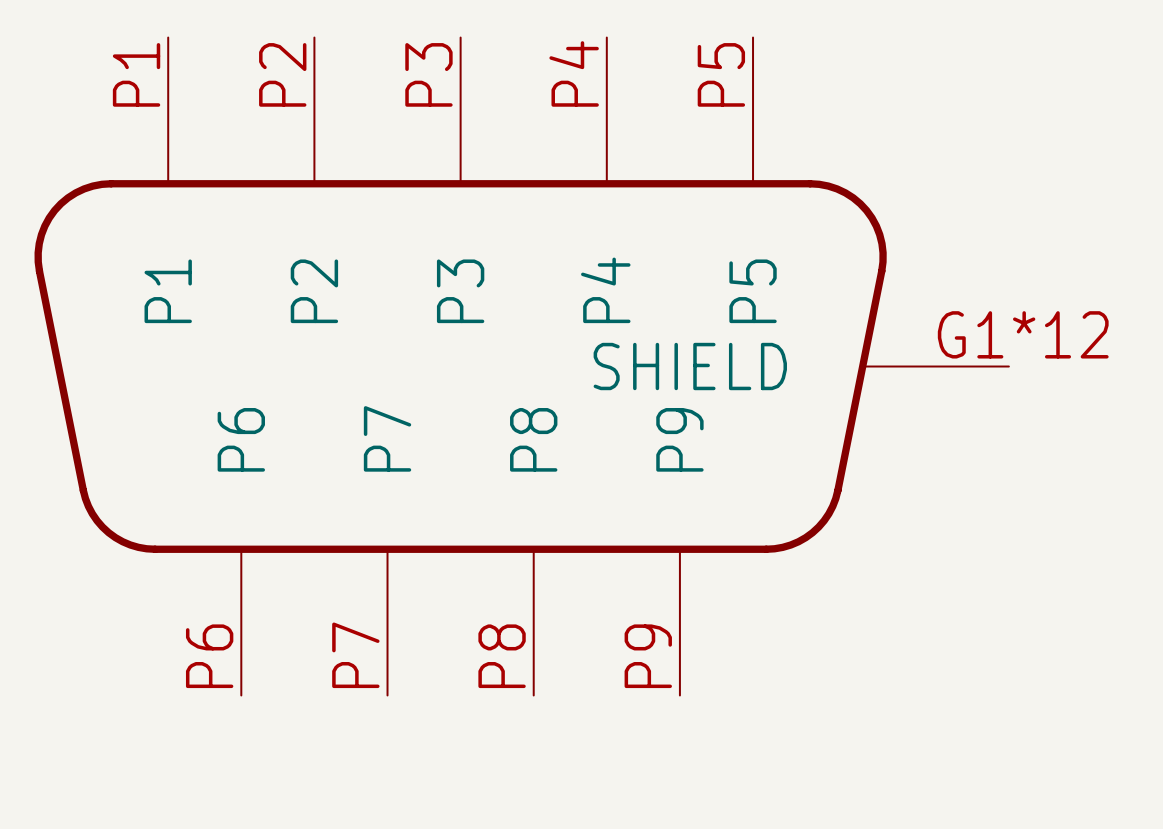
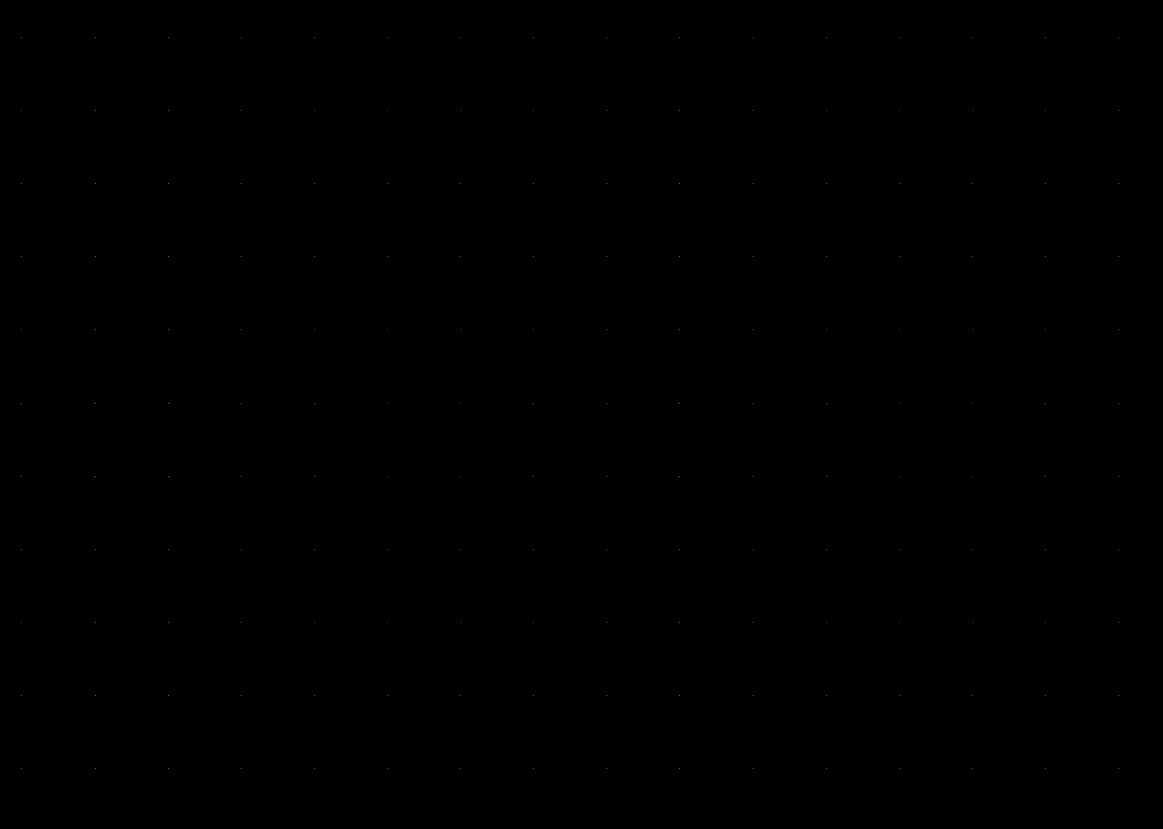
part: (521, 366) -> none

